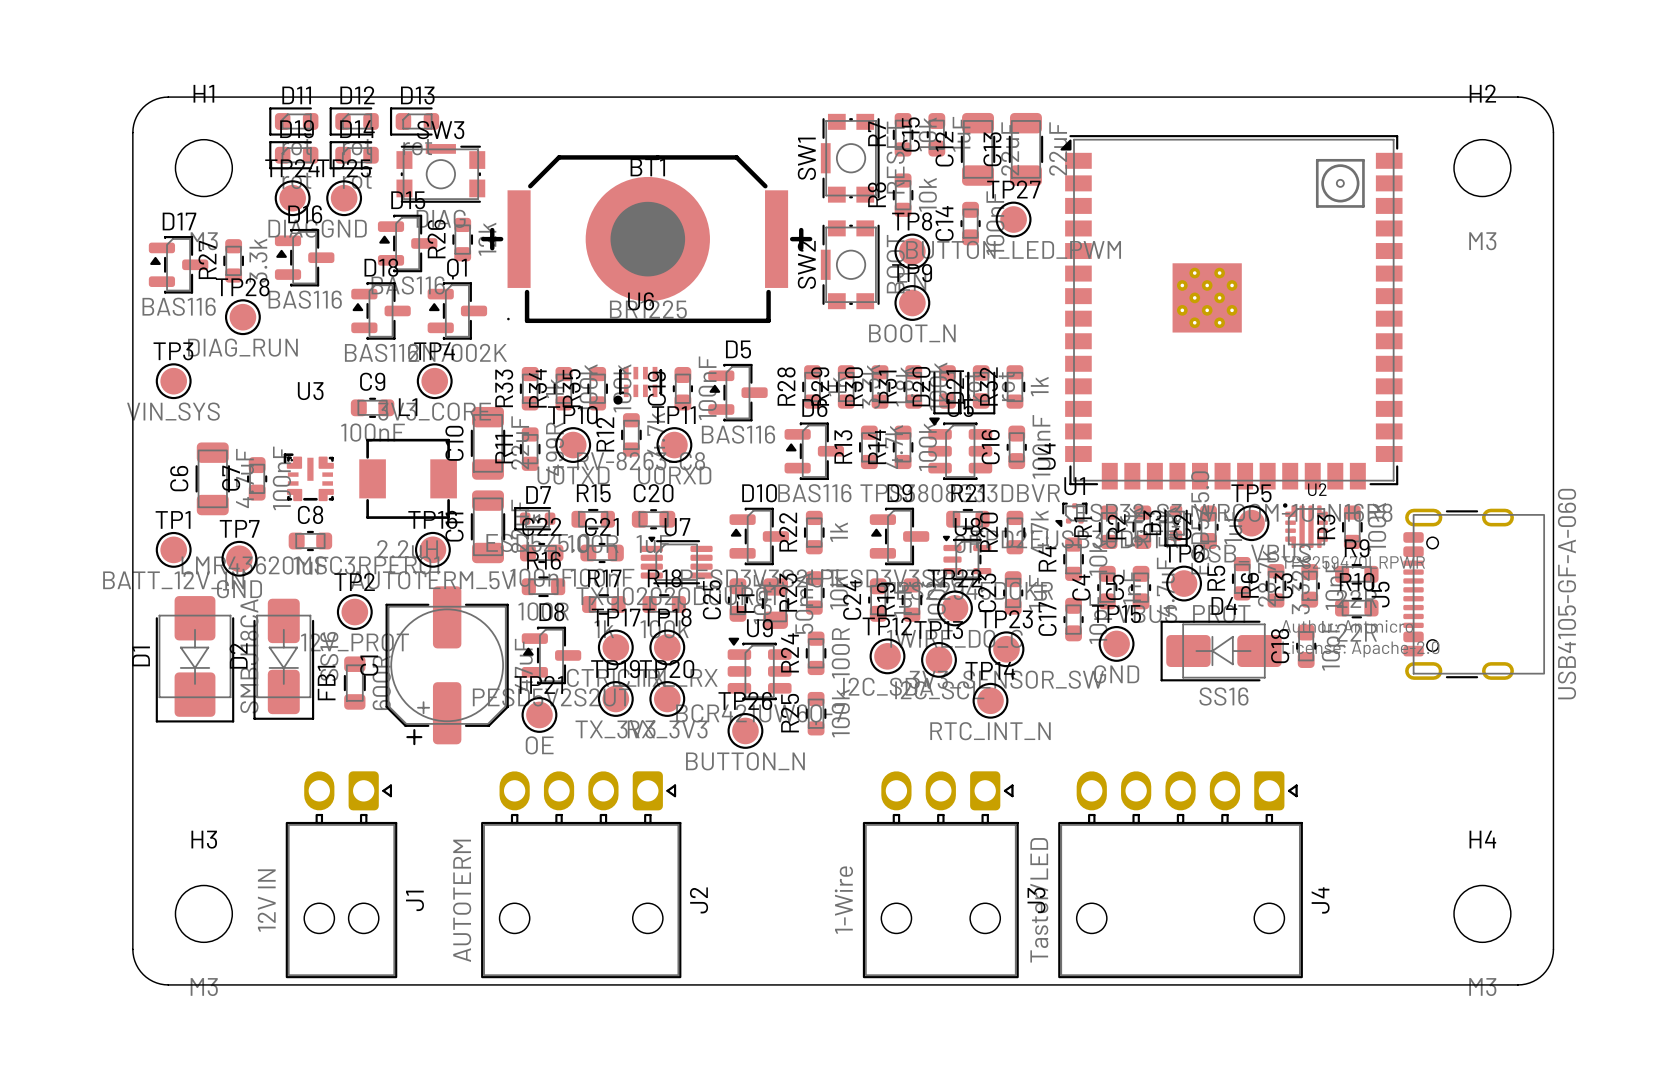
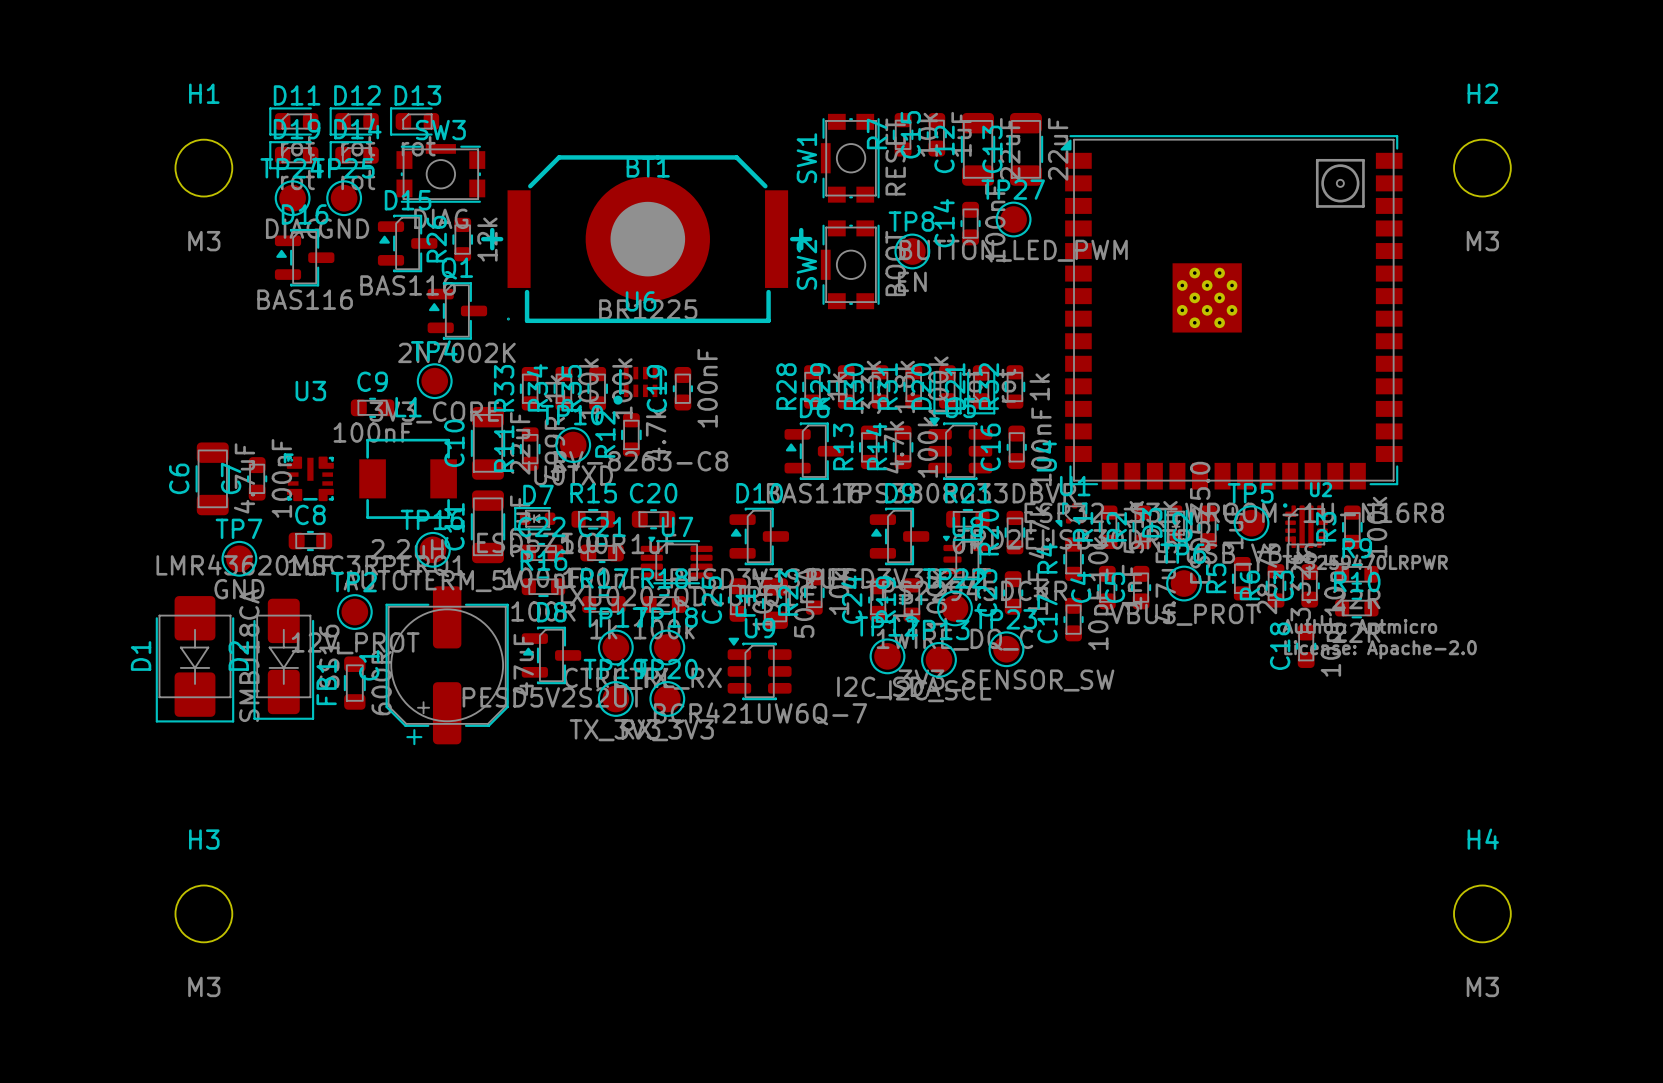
board edge: (168, 97) (1517, 97) (1536, 102) (1548, 113) (1553, 132) (1553, 949) (1548, 968) (1533, 981) (1517, 984) (168, 984) (149, 979) (138, 968) (132, 949) (132, 132) (136, 117) (143, 107) (152, 100) (168, 97) -> none
R8: 10k (903, 195) -> none
R27: 3.3k (233, 260) -> none
D17: BAS116 (178, 264) -> none
TP9: BOOT_N (912, 302) -> none
D18: BAS116 (381, 310) -> none
TP28: DIAG_RUN (242, 317) -> none
TP3: VIN_SYS (173, 381) -> none
D5: BAS116 (737, 392) -> none
TP11: U0RXD (674, 445) -> none
R22: 1k (814, 532) -> none
TP1: BATT_12V_IN (173, 549) -> none
J5: USB4105-GF-A-060 (1474, 594) -> none
TP15: GND (1116, 643) -> none
D4: SS16 (1221, 651) -> none
R24: 100R (816, 653) -> none
TP14: RTC_INT_N (990, 700) -> none
R25: 100k (816, 713) -> none
TP21: OE (539, 714) -> none
TP26: BUTTON_N (745, 730) -> none
J1: 12V IN (341, 874) -> none
J2: AUTOTERM (581, 874) -> none
J3: 1-Wire (940, 874) -> none
J4: Taster/LED (1180, 874) -> none

